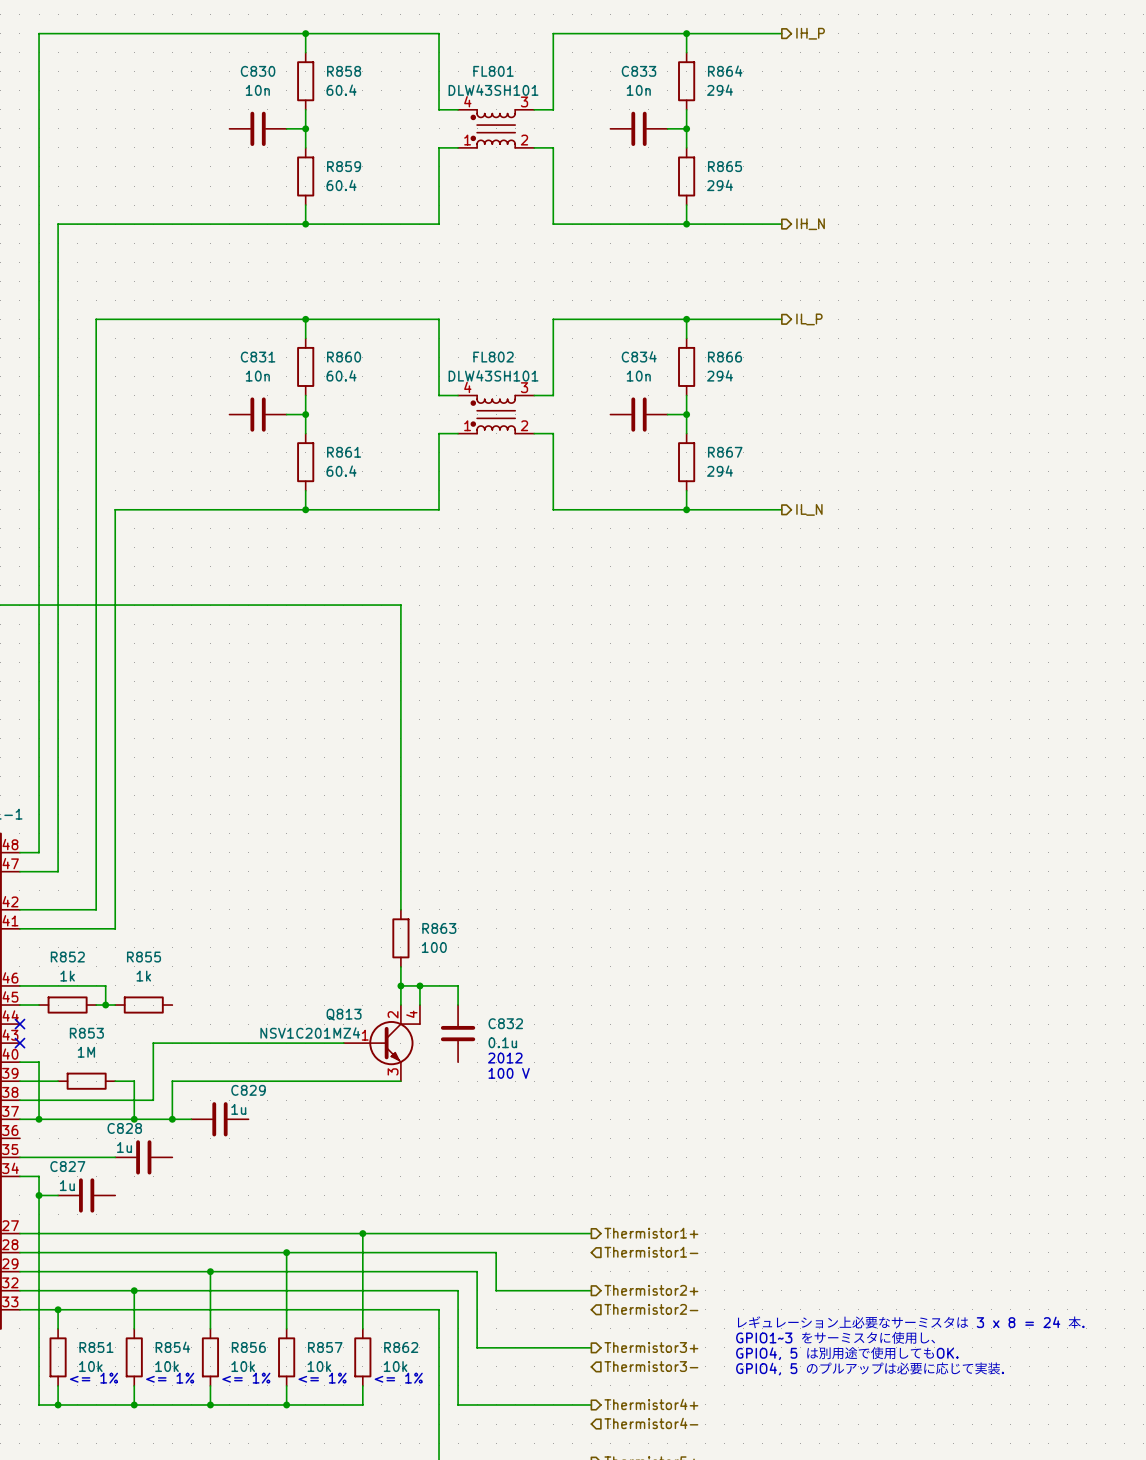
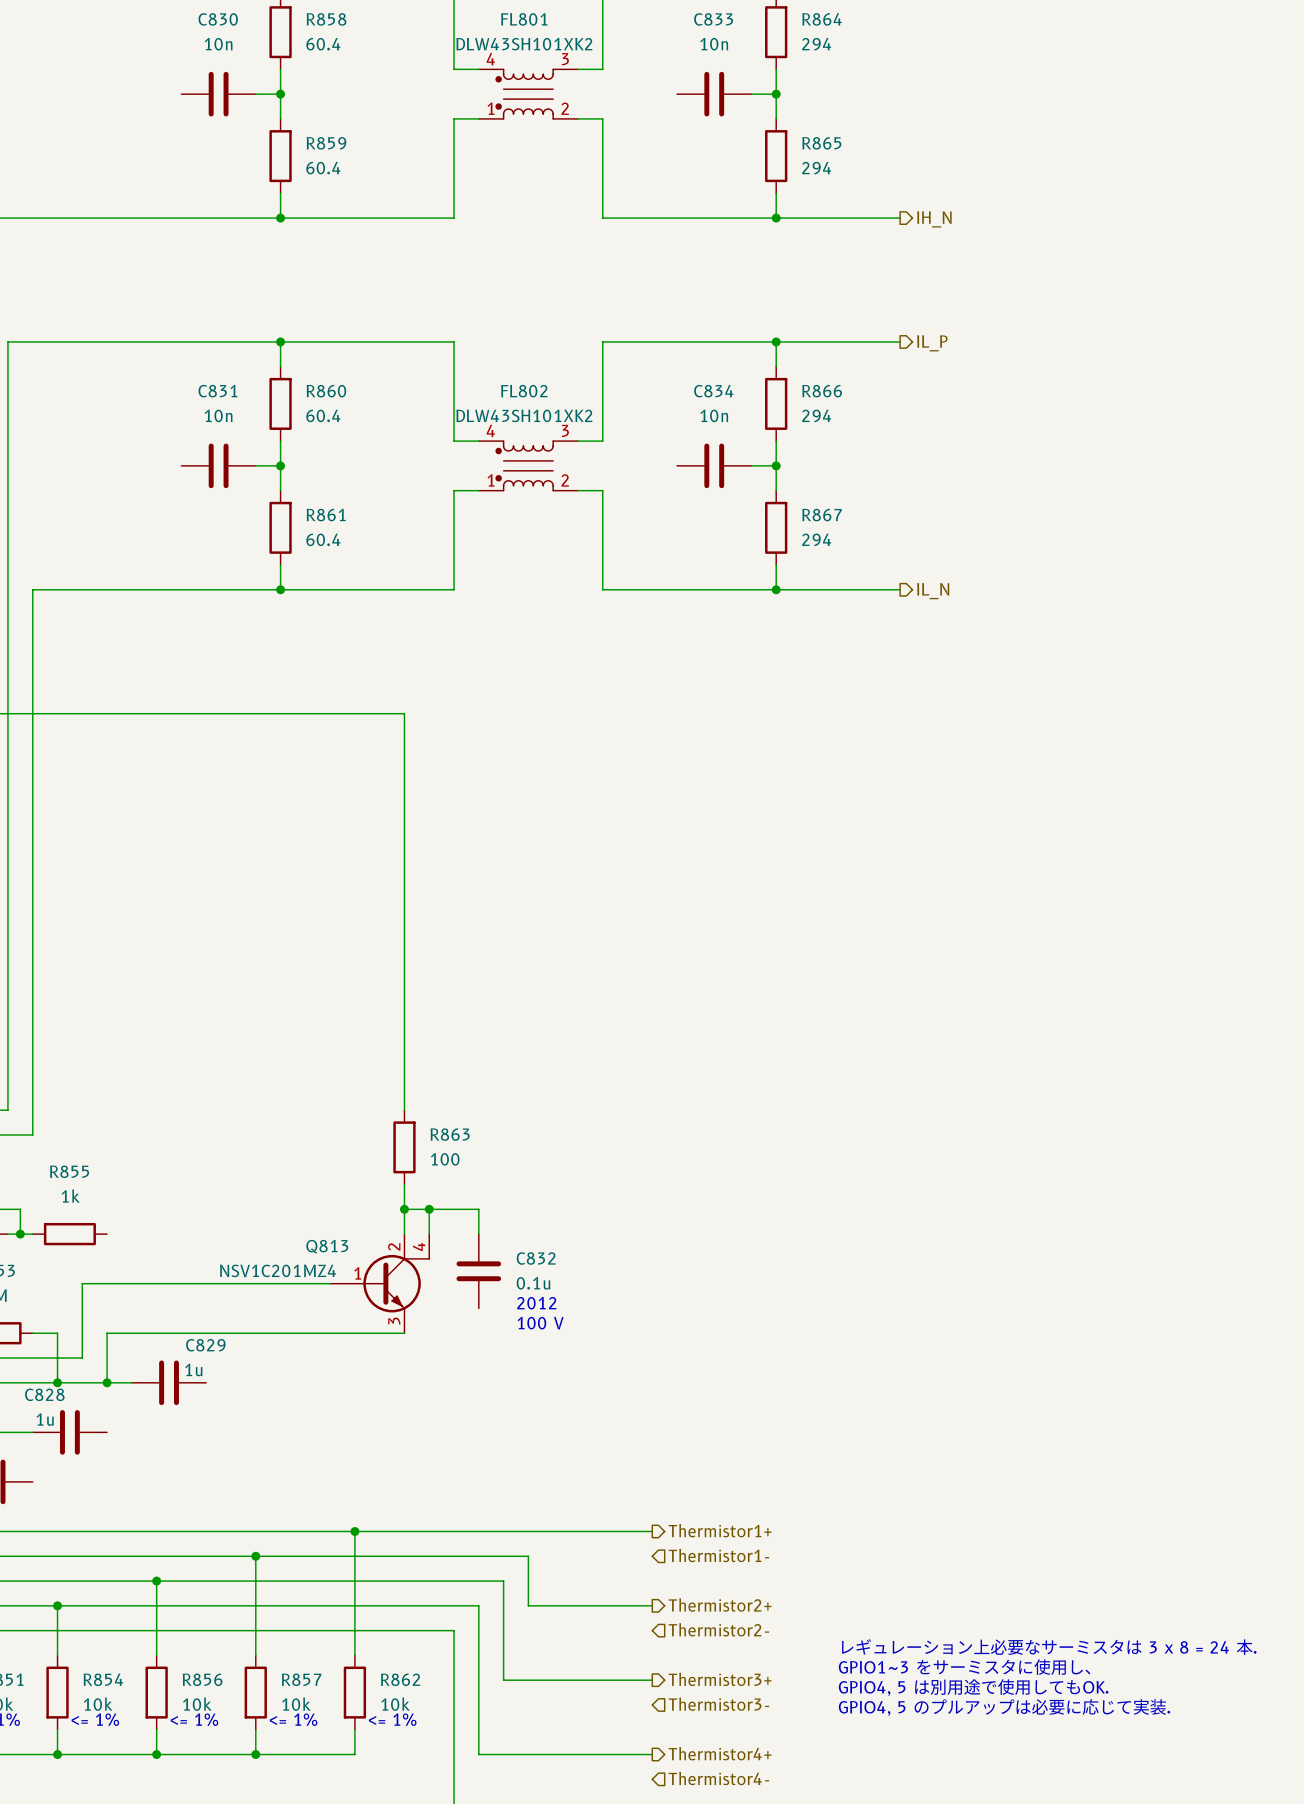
FL801 value: DLW43SH101 (493, 90) -> DLW43SH101XK2 (524, 44)
FL802 value: DLW43SH101 (493, 375) -> DLW43SH101XK2 (524, 415)

